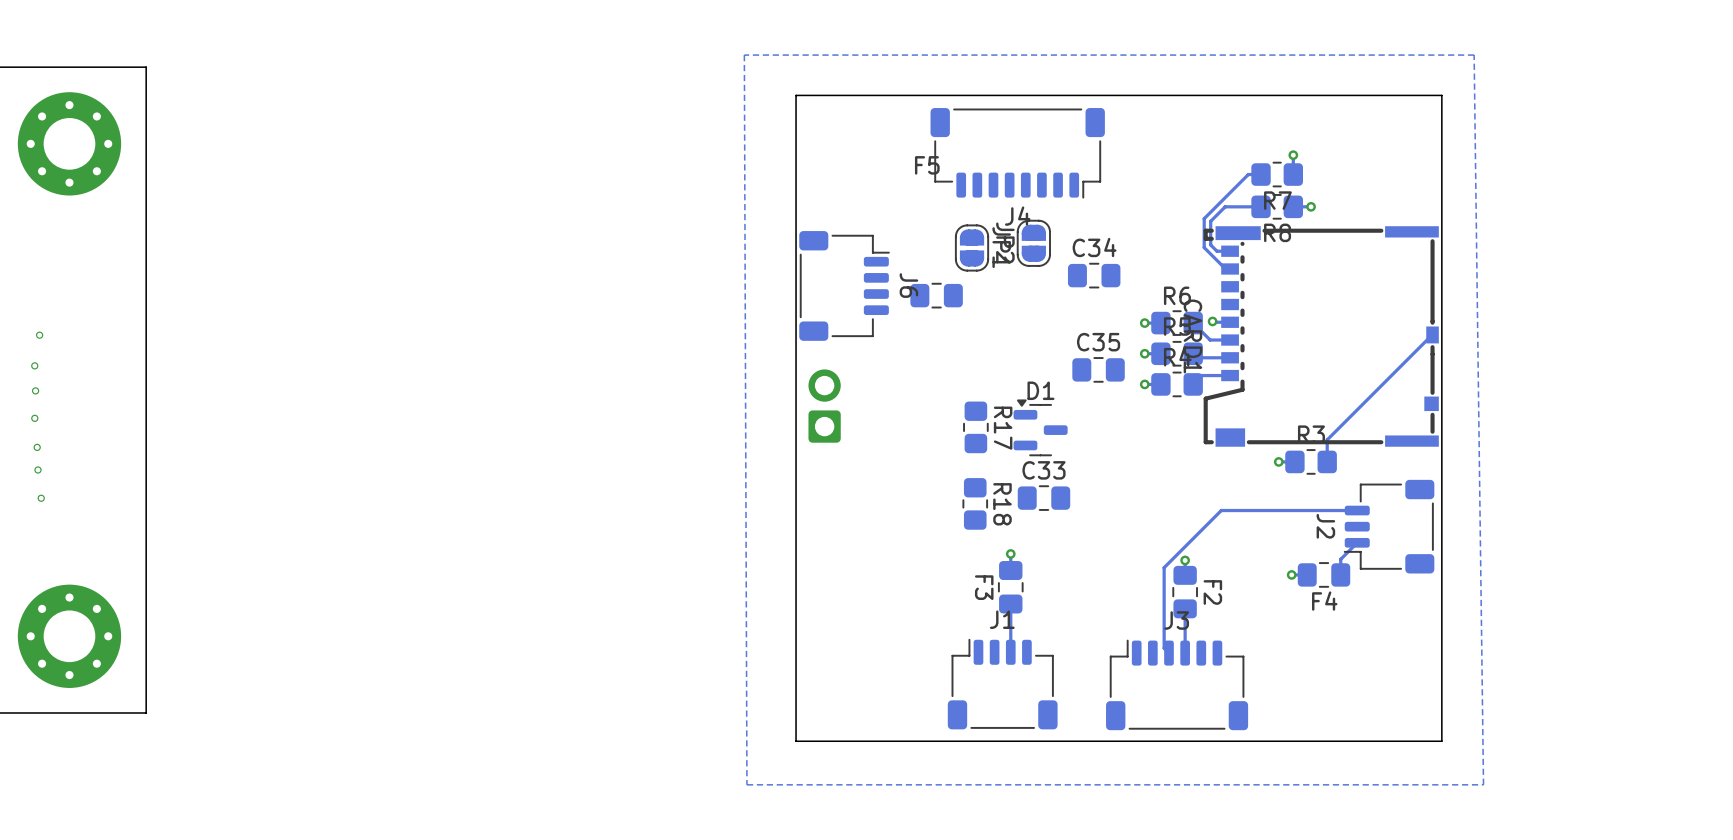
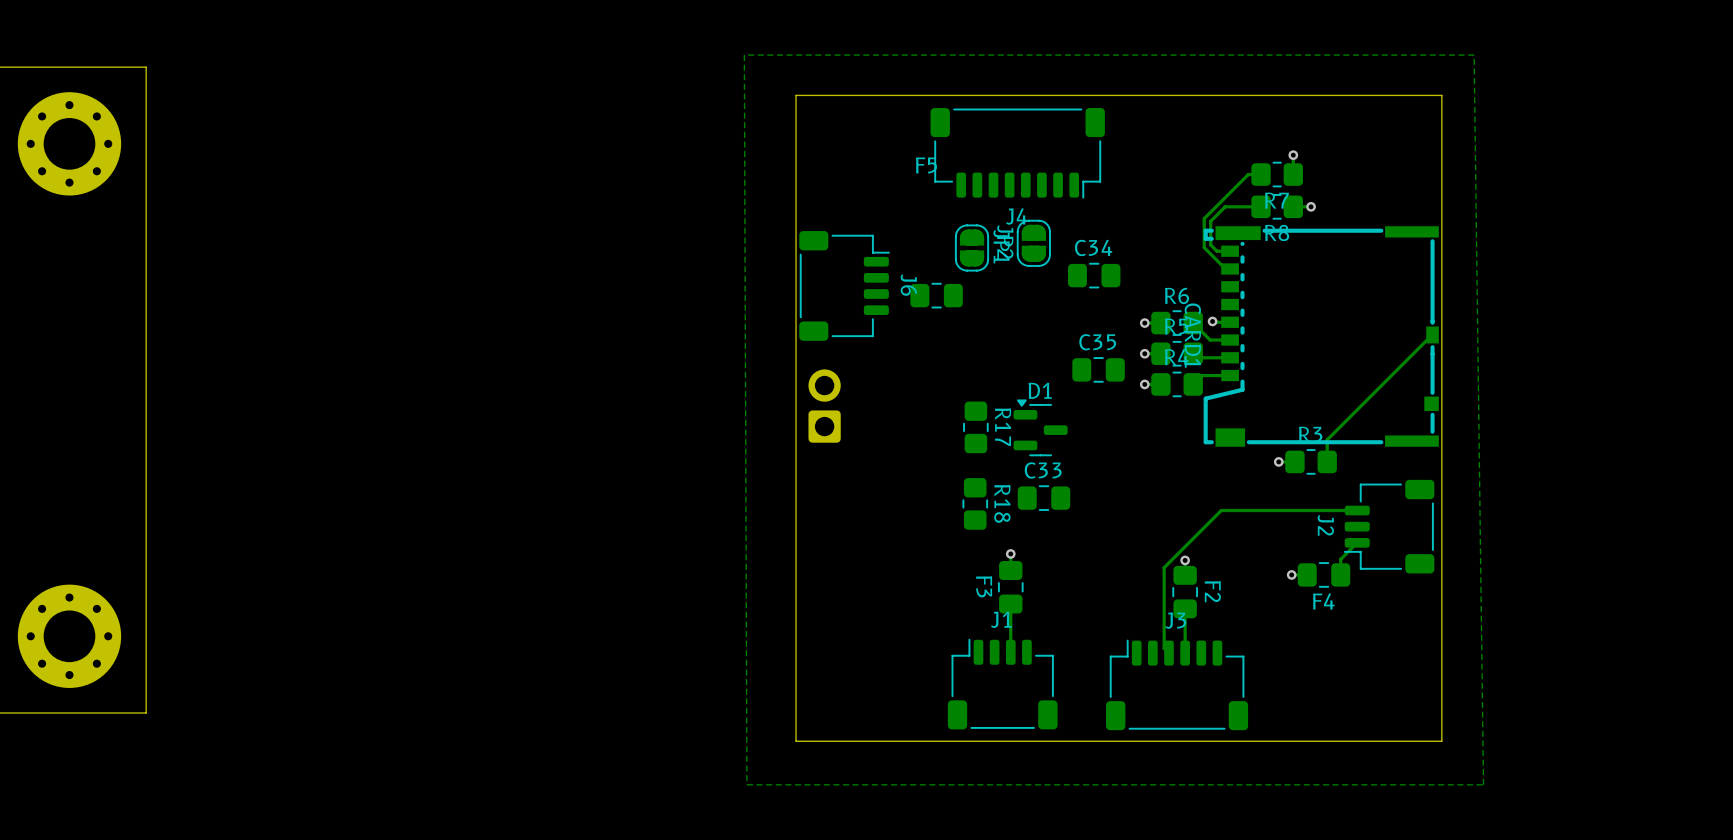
via: (39, 335) -> none
via: (34, 365) -> none
via: (35, 390) -> none
via: (34, 418) -> none
via: (37, 447) -> none
via: (37, 470) -> none
via: (41, 498) -> none

